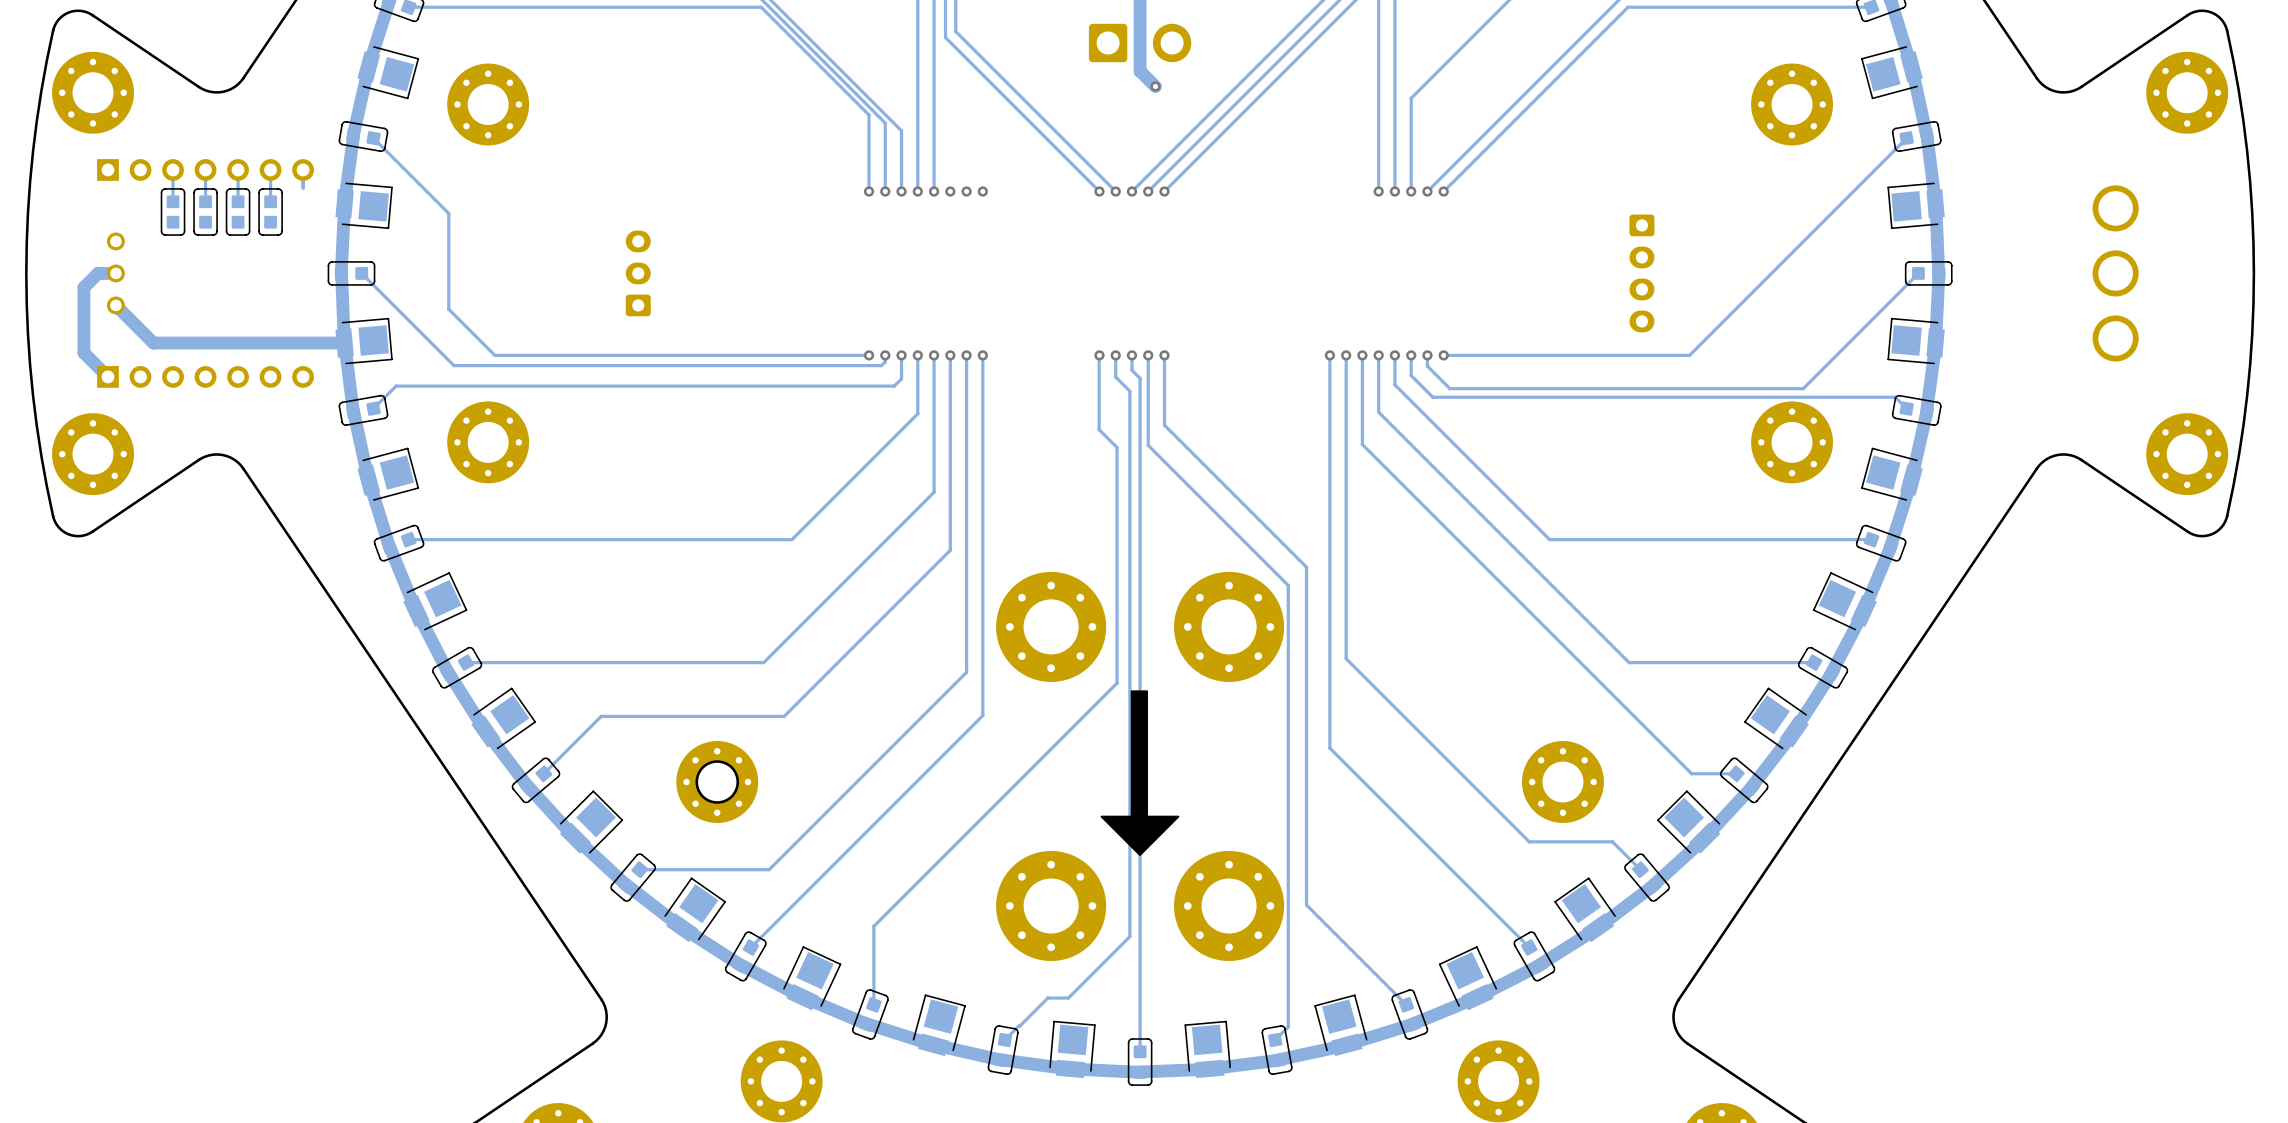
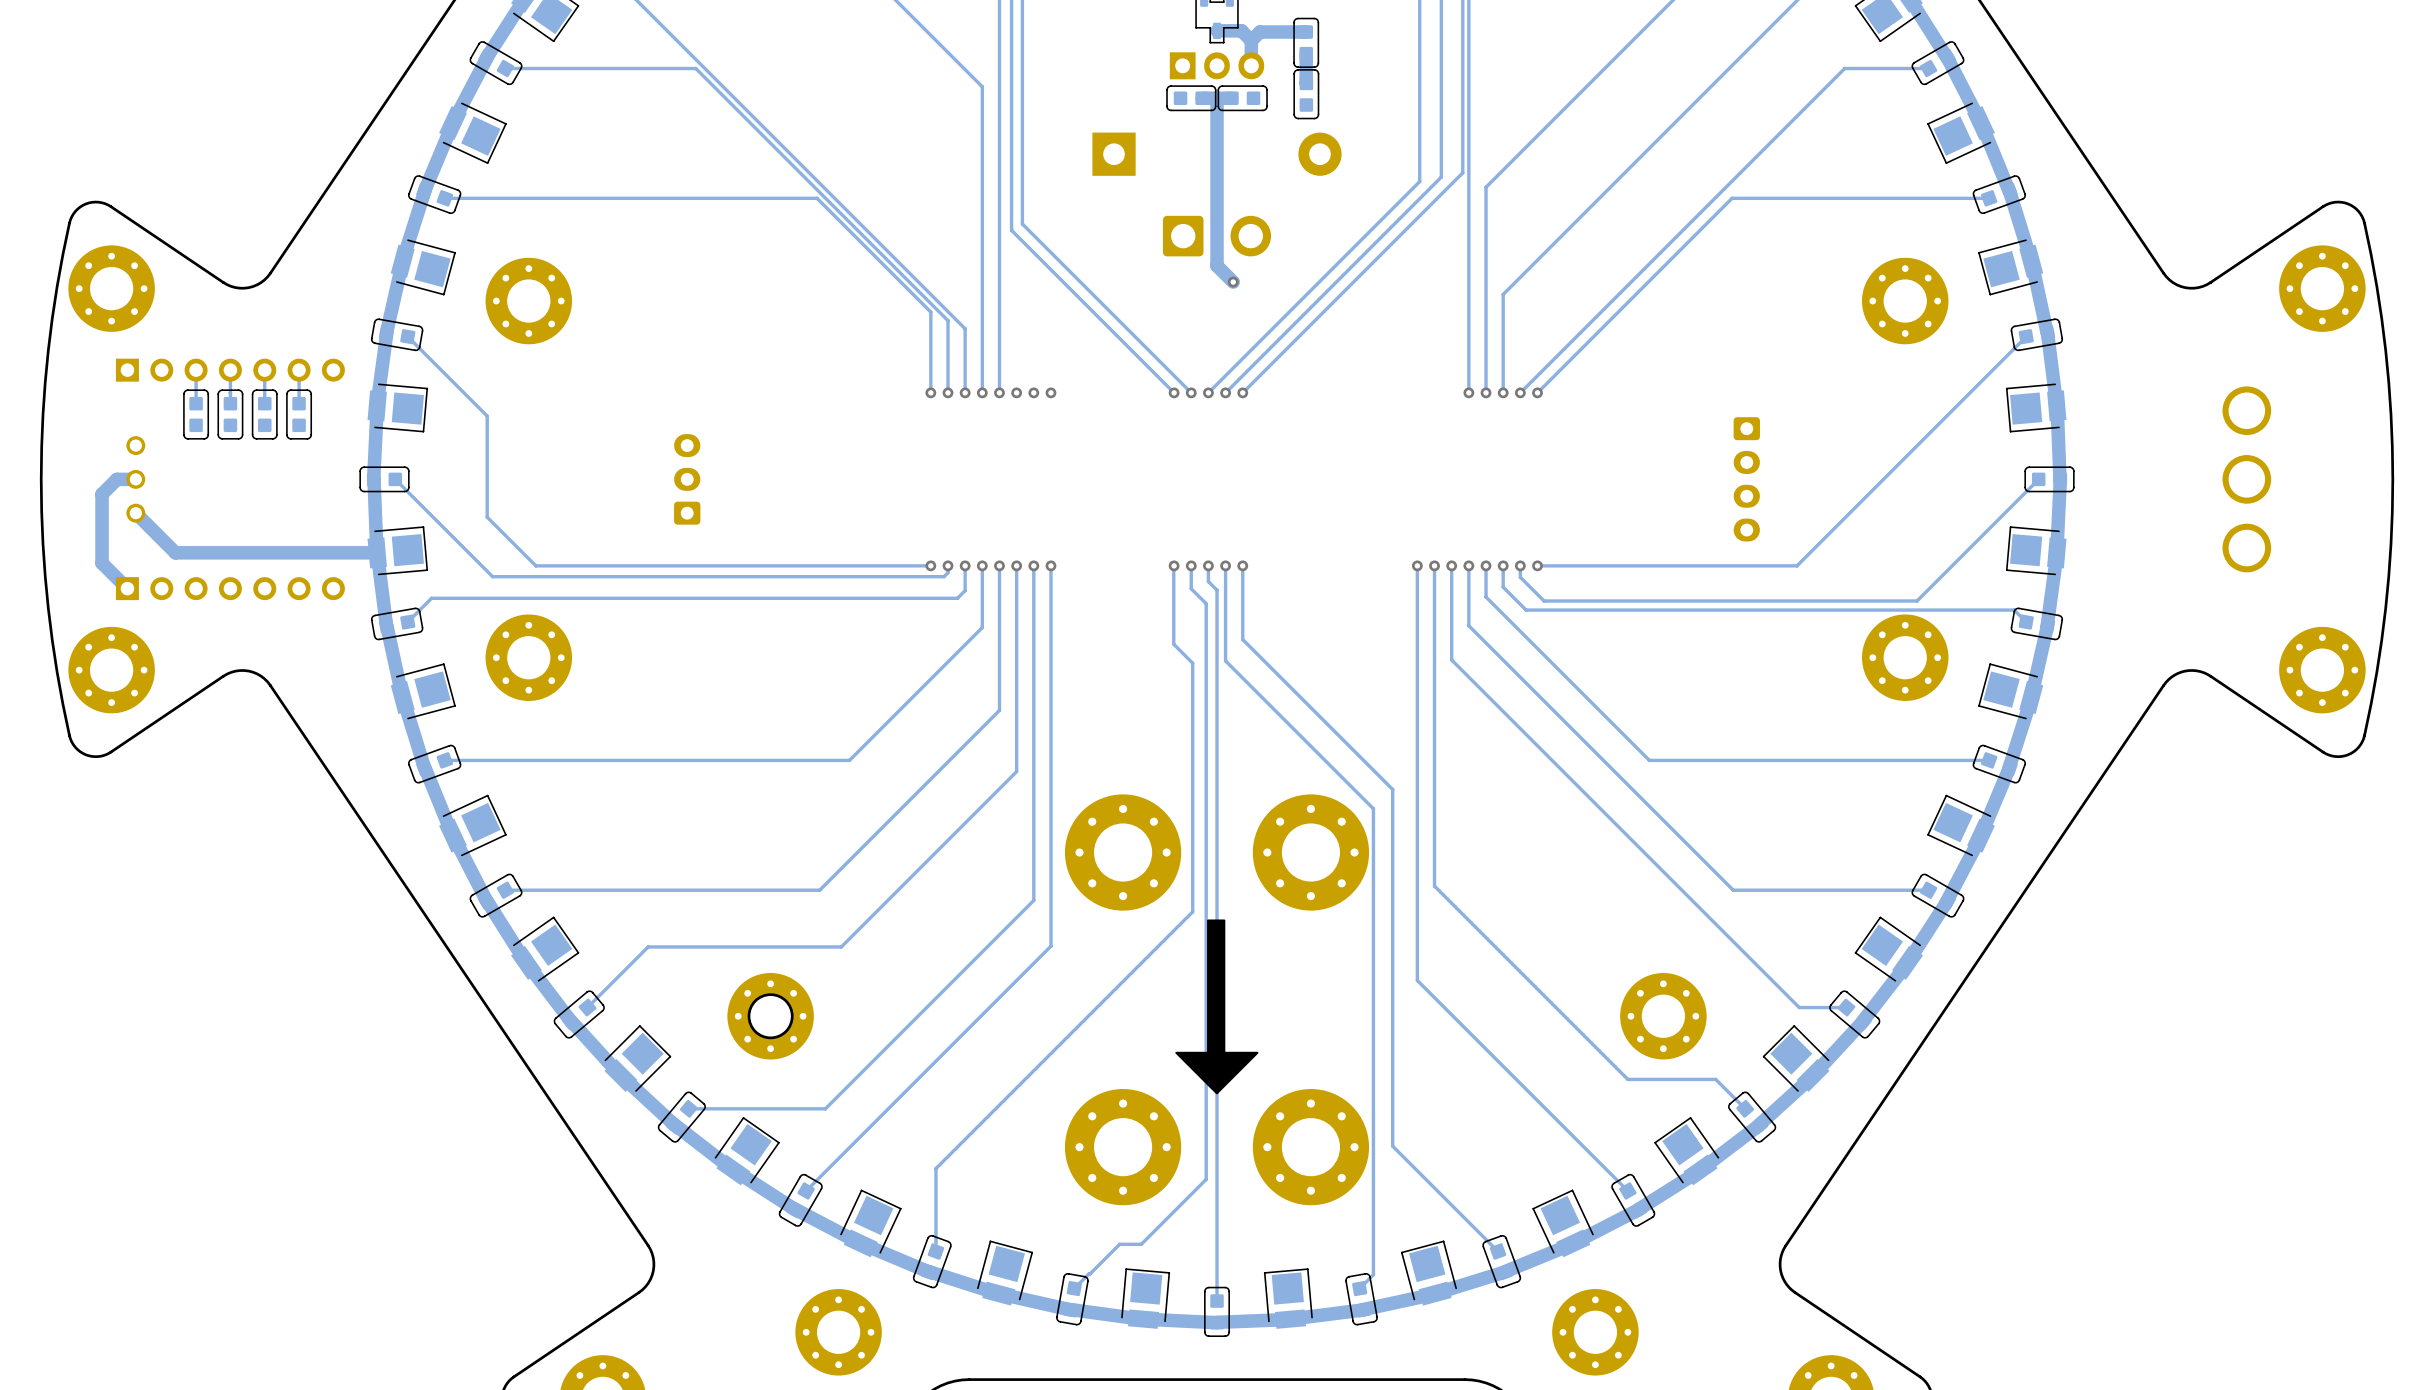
track: (303, 169) (303, 187) -> none

